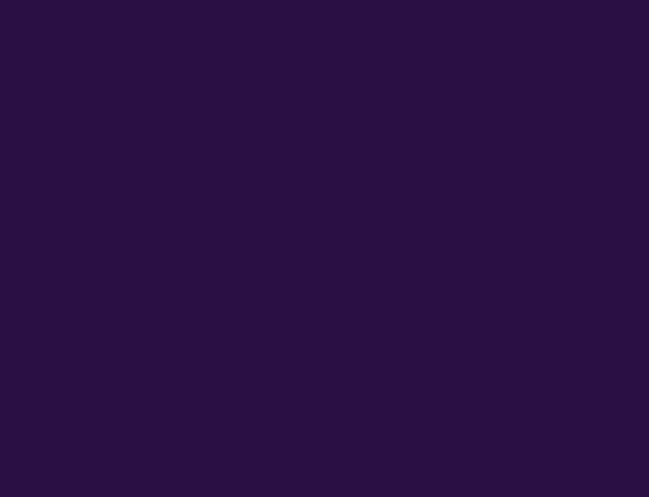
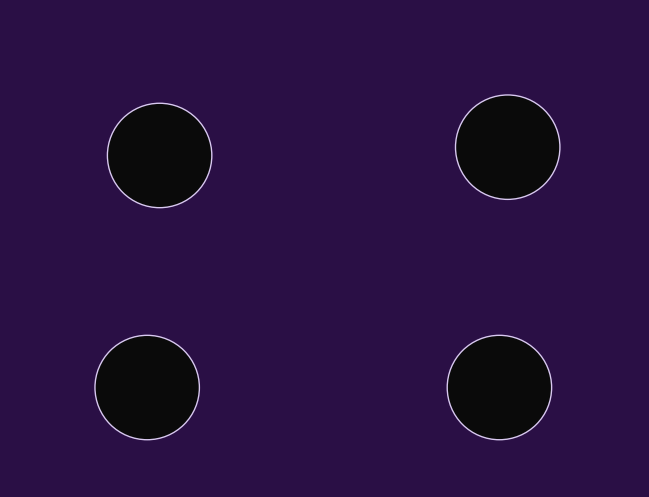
part: none -> (507, 147)
part: none -> (159, 155)
part: none -> (147, 387)
part: none -> (499, 387)

